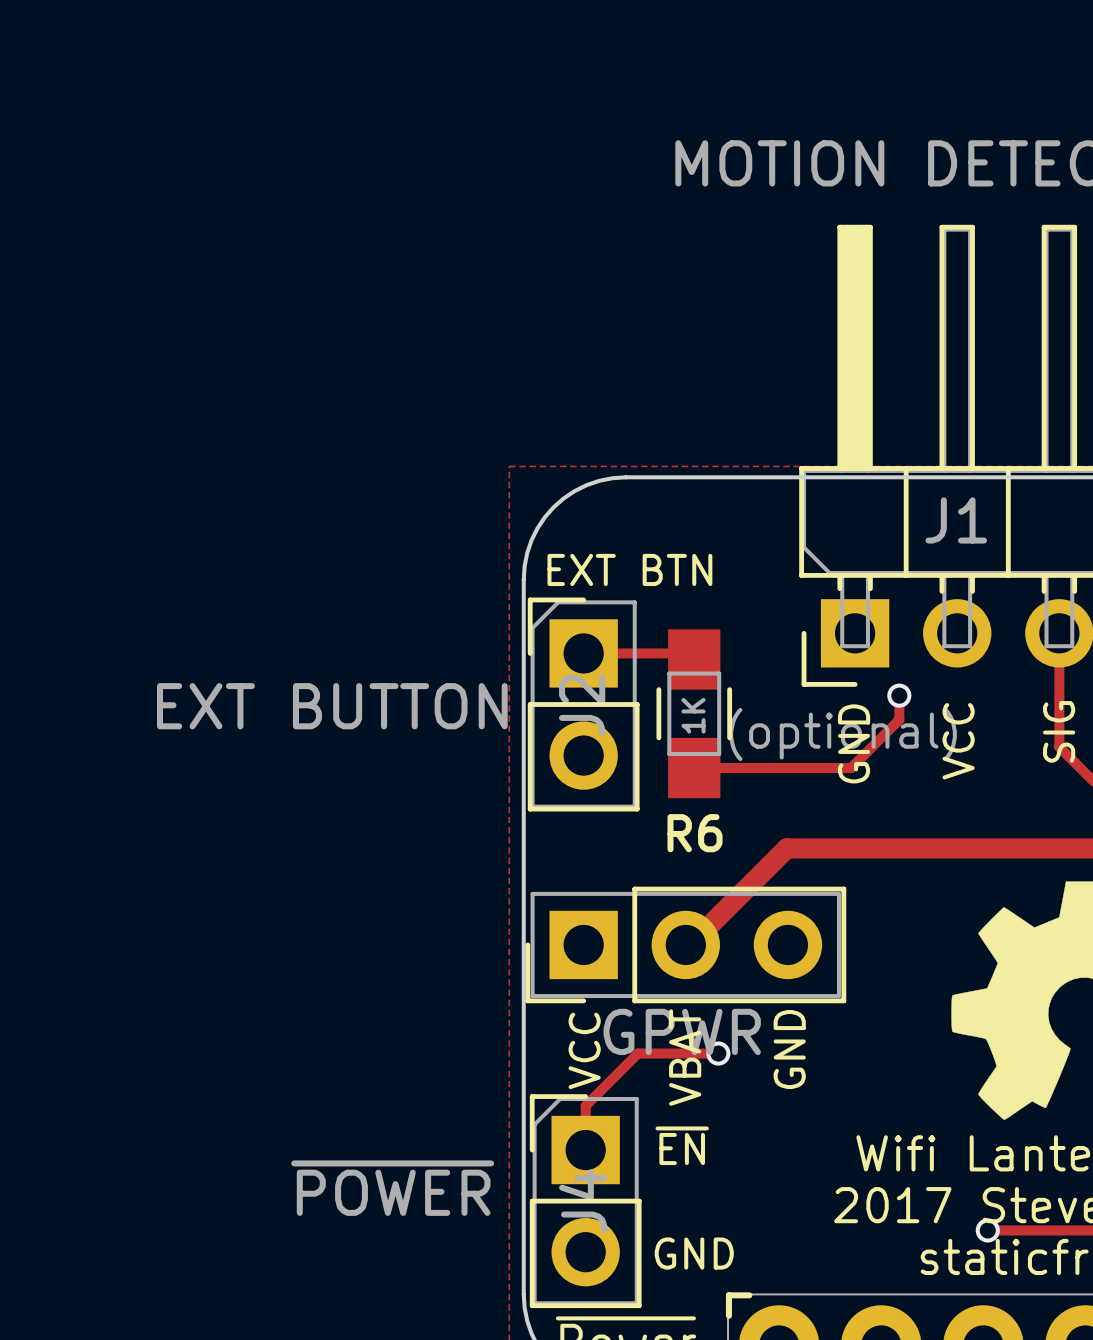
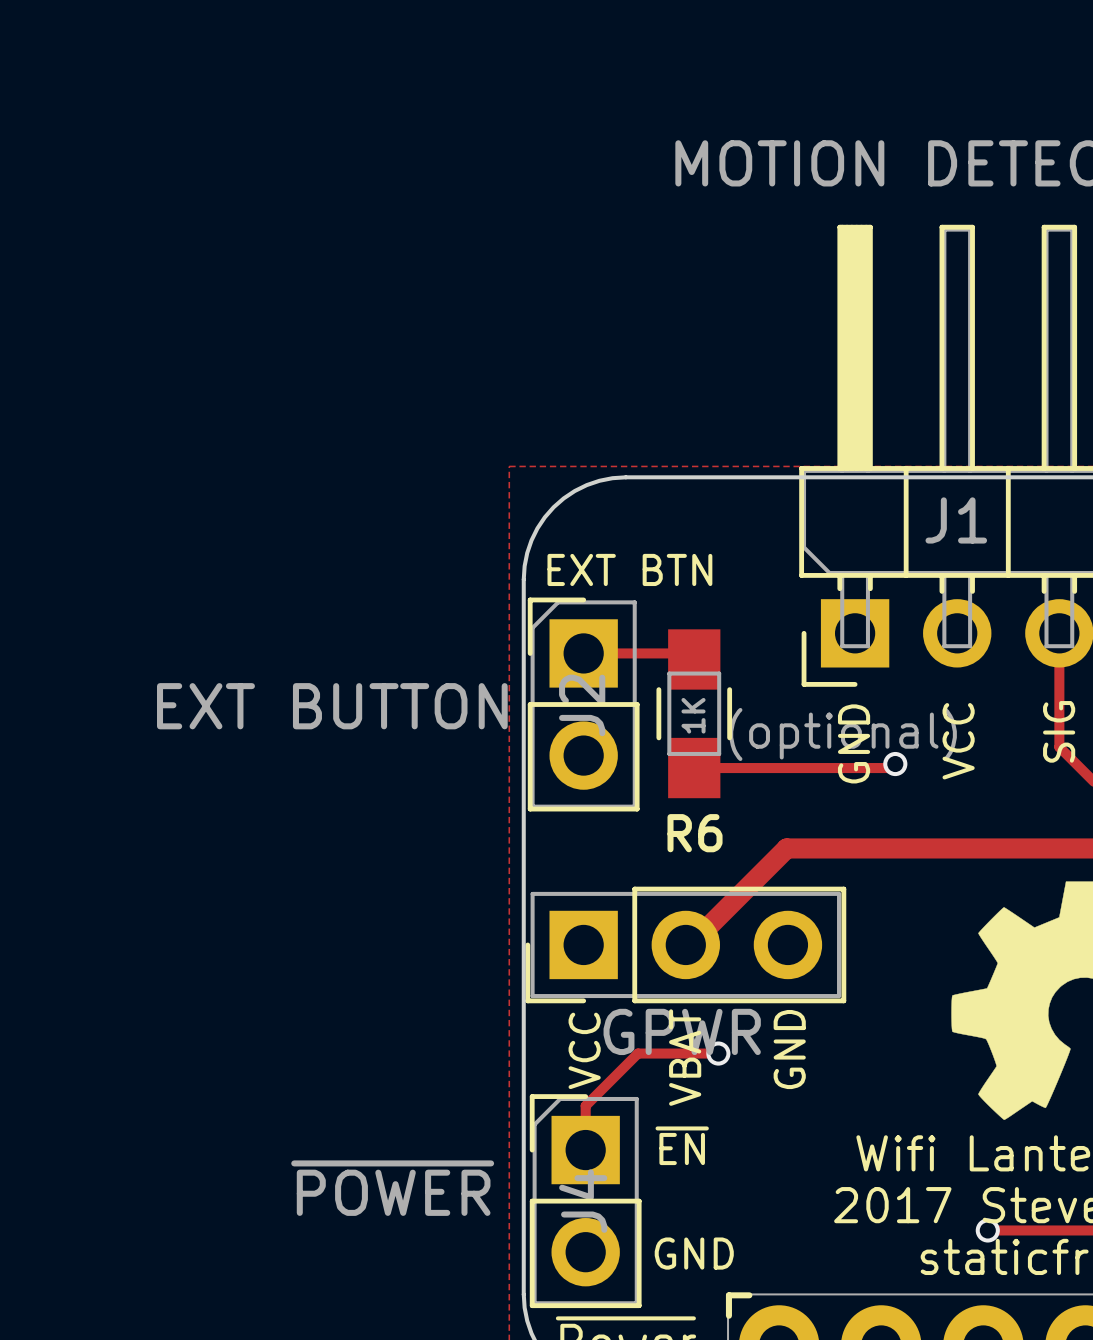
track: (899, 695) (899, 719) (851, 768) -> (895, 764) (891, 768) (851, 768)
via position: (899, 695) -> (895, 764)

